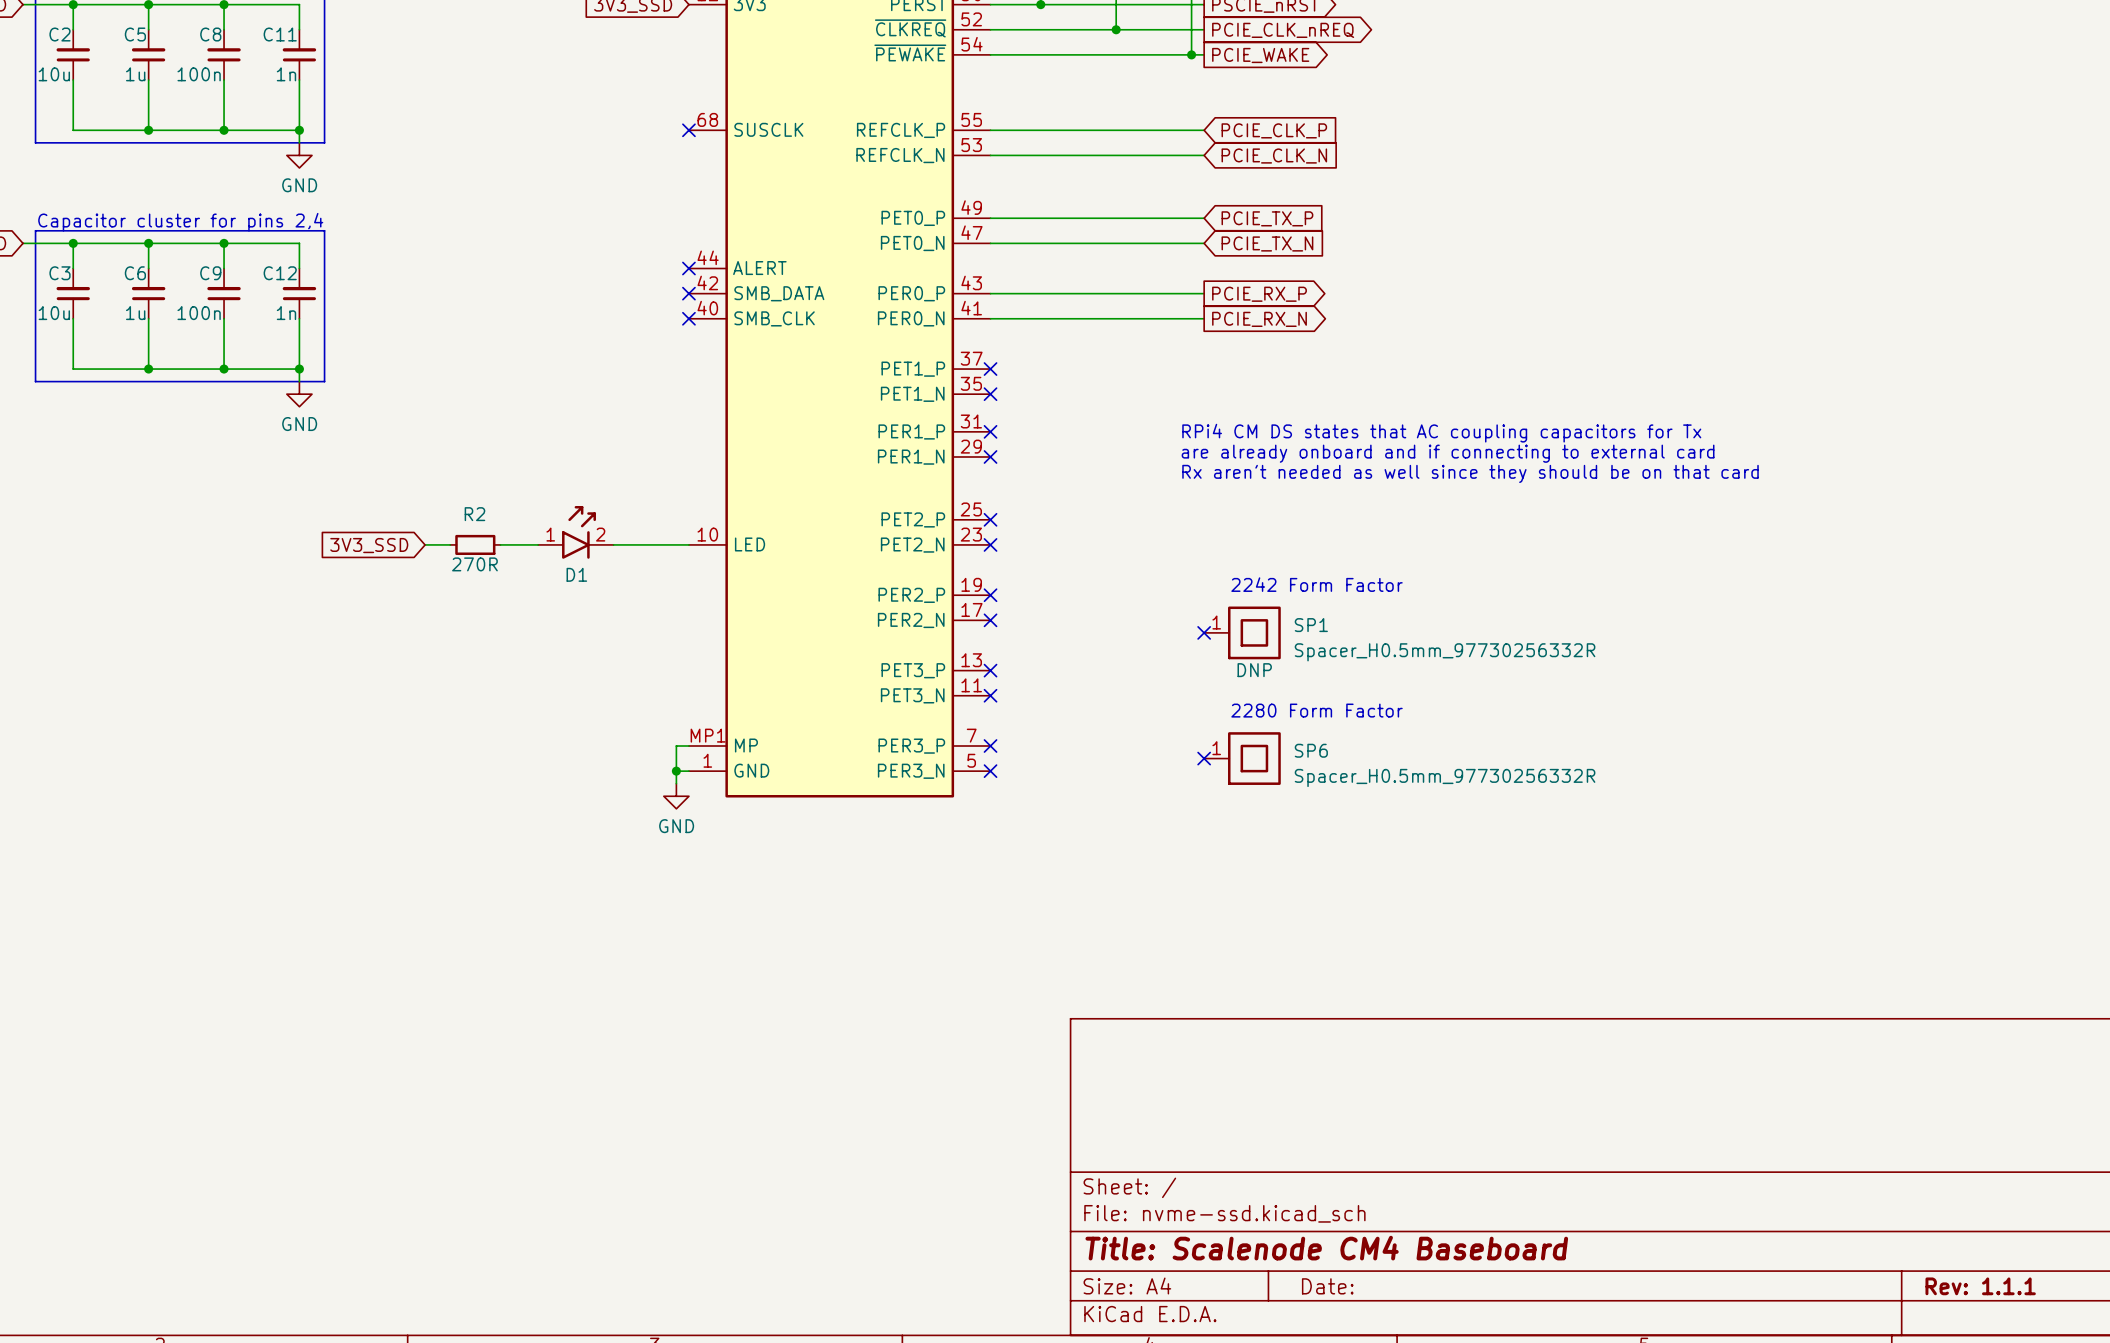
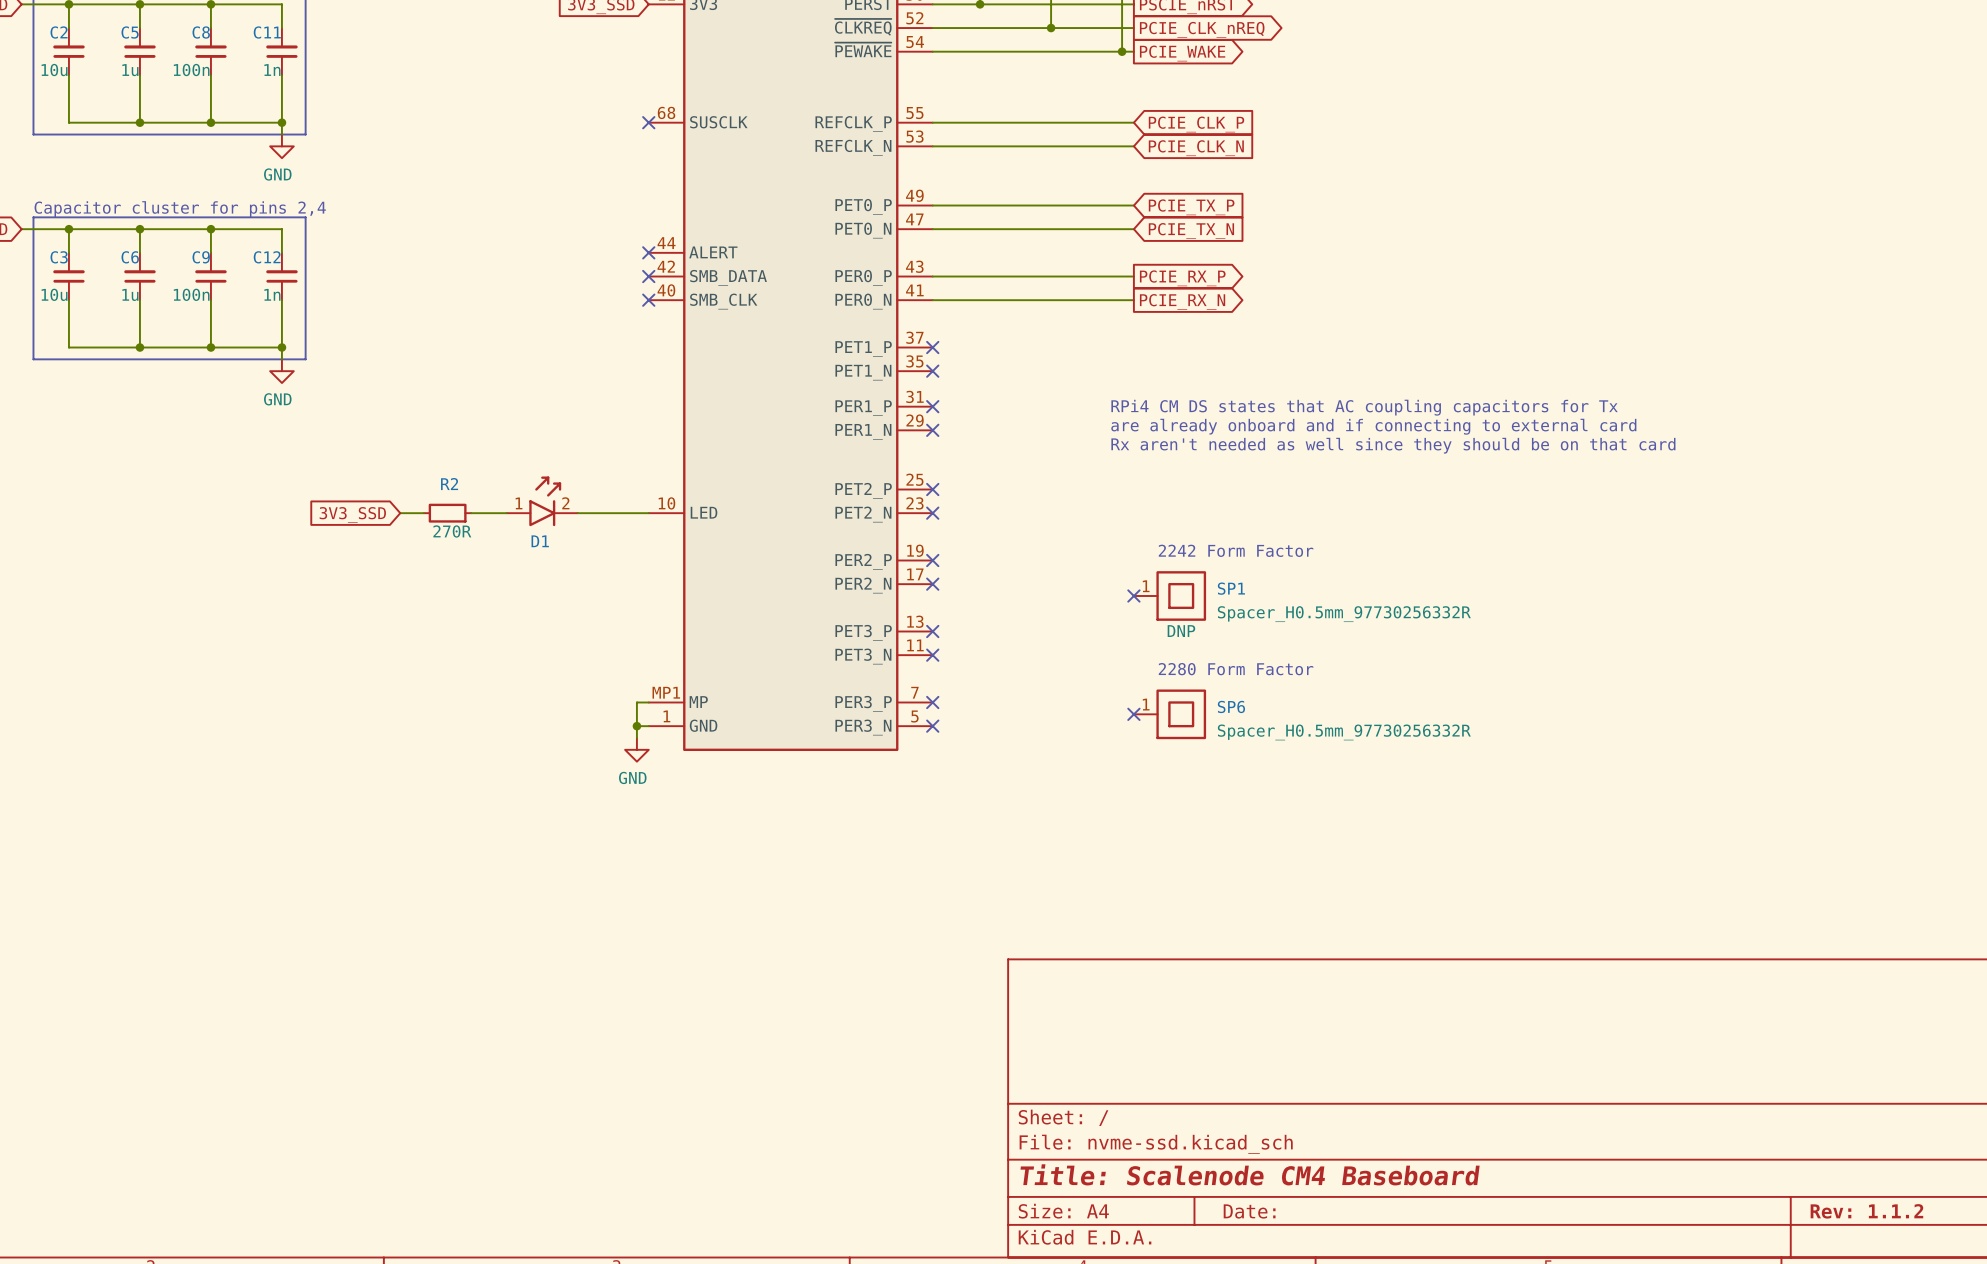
title block: Rev: 1.1.1 (1980, 1286) -> Rev: 1.1.2 (1866, 1211)

